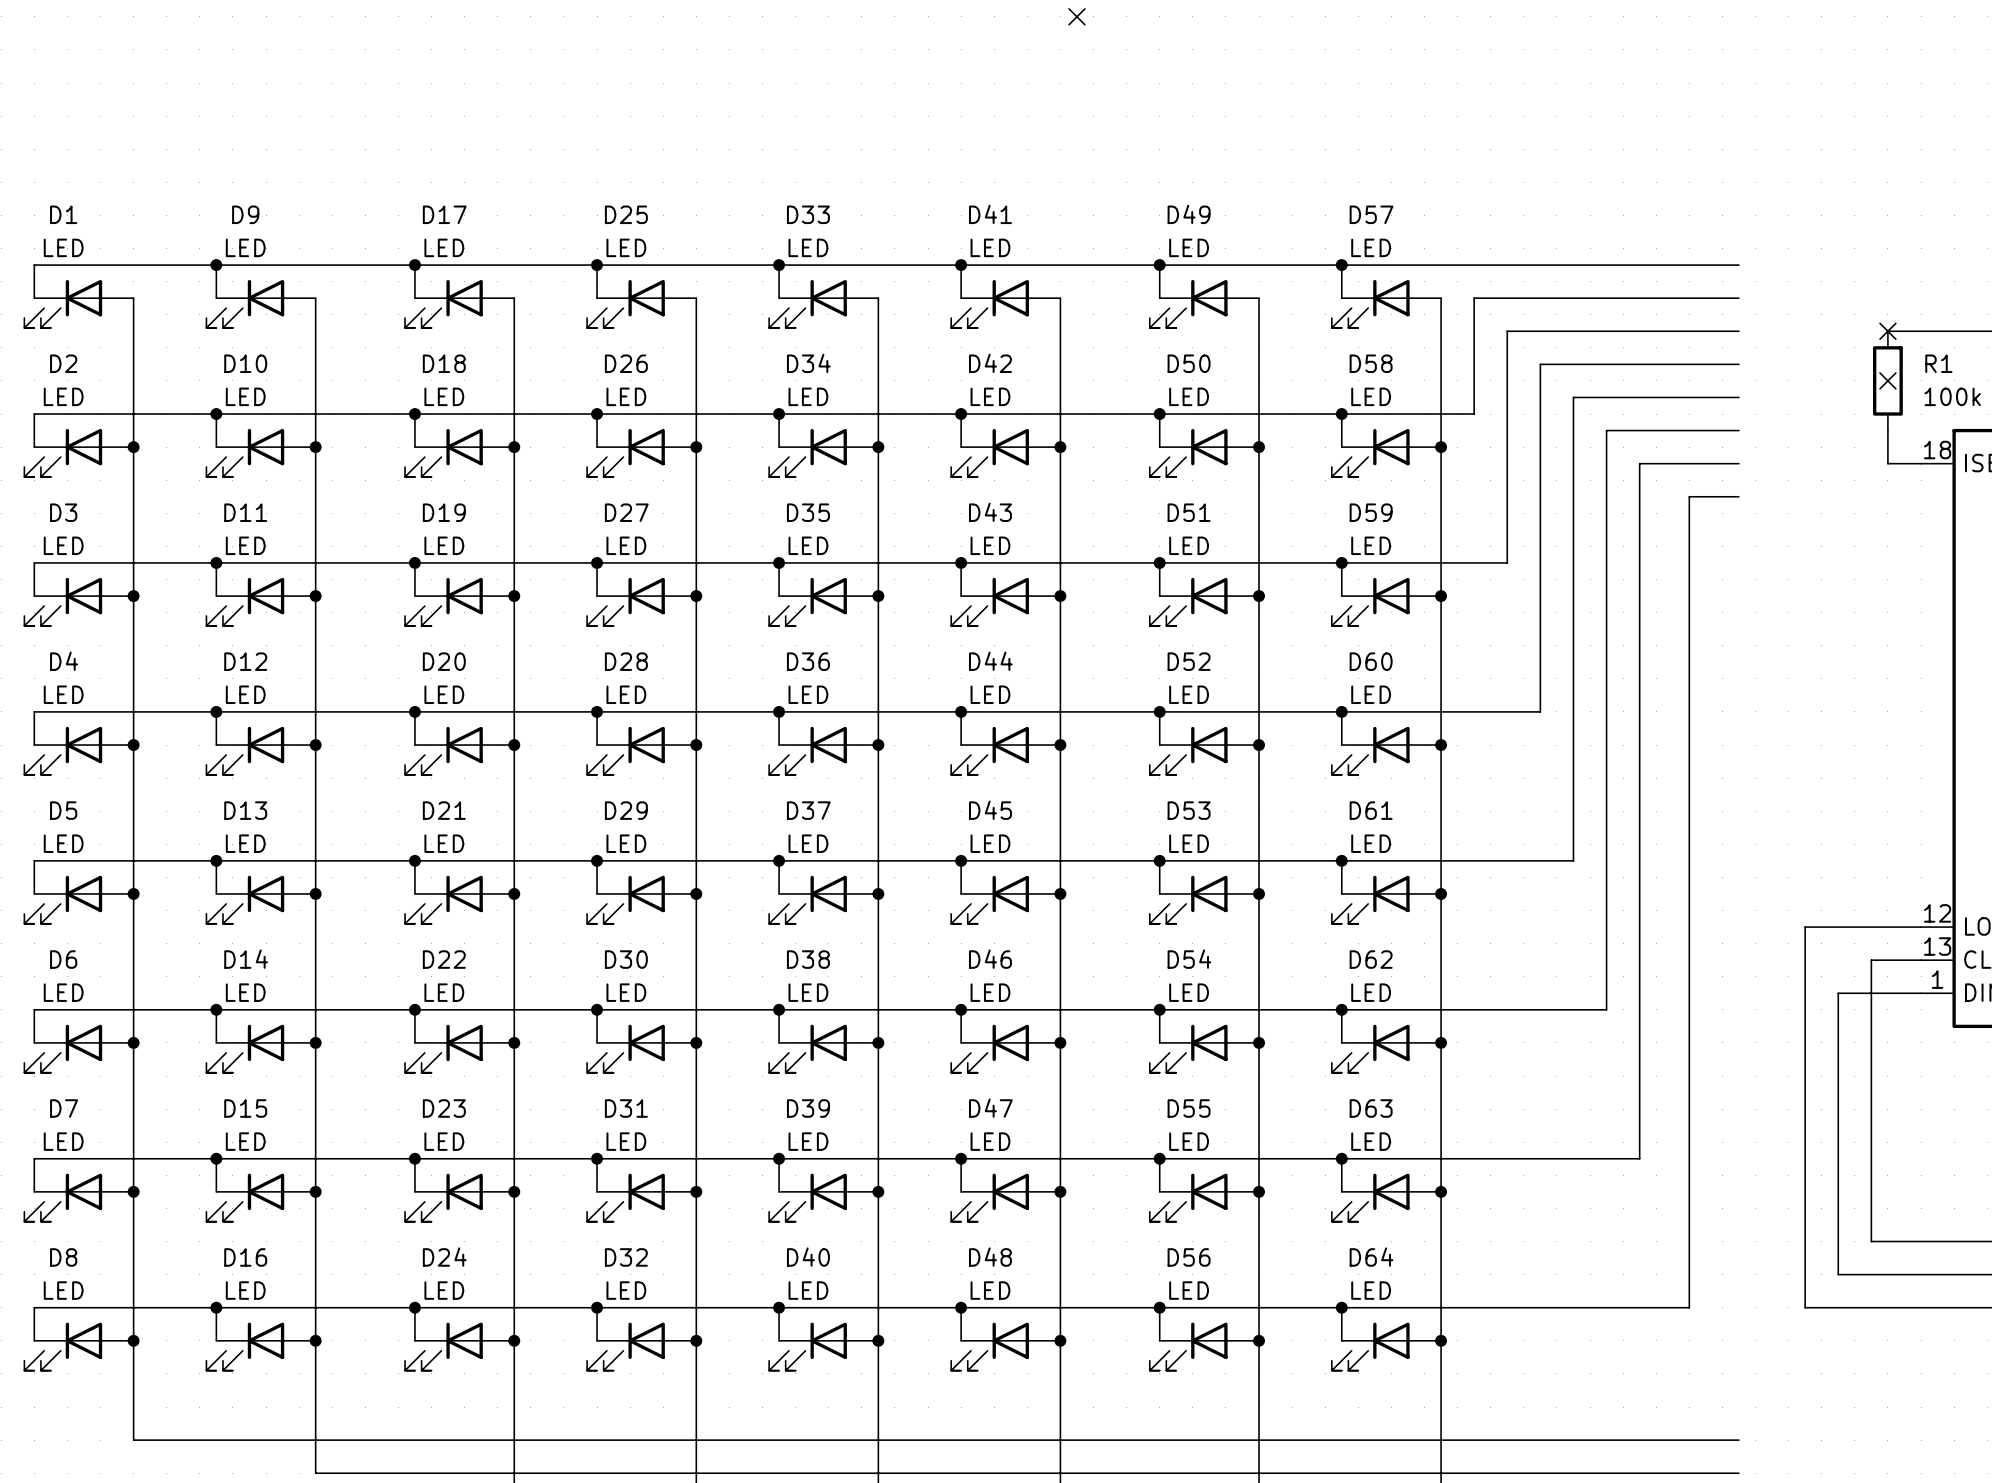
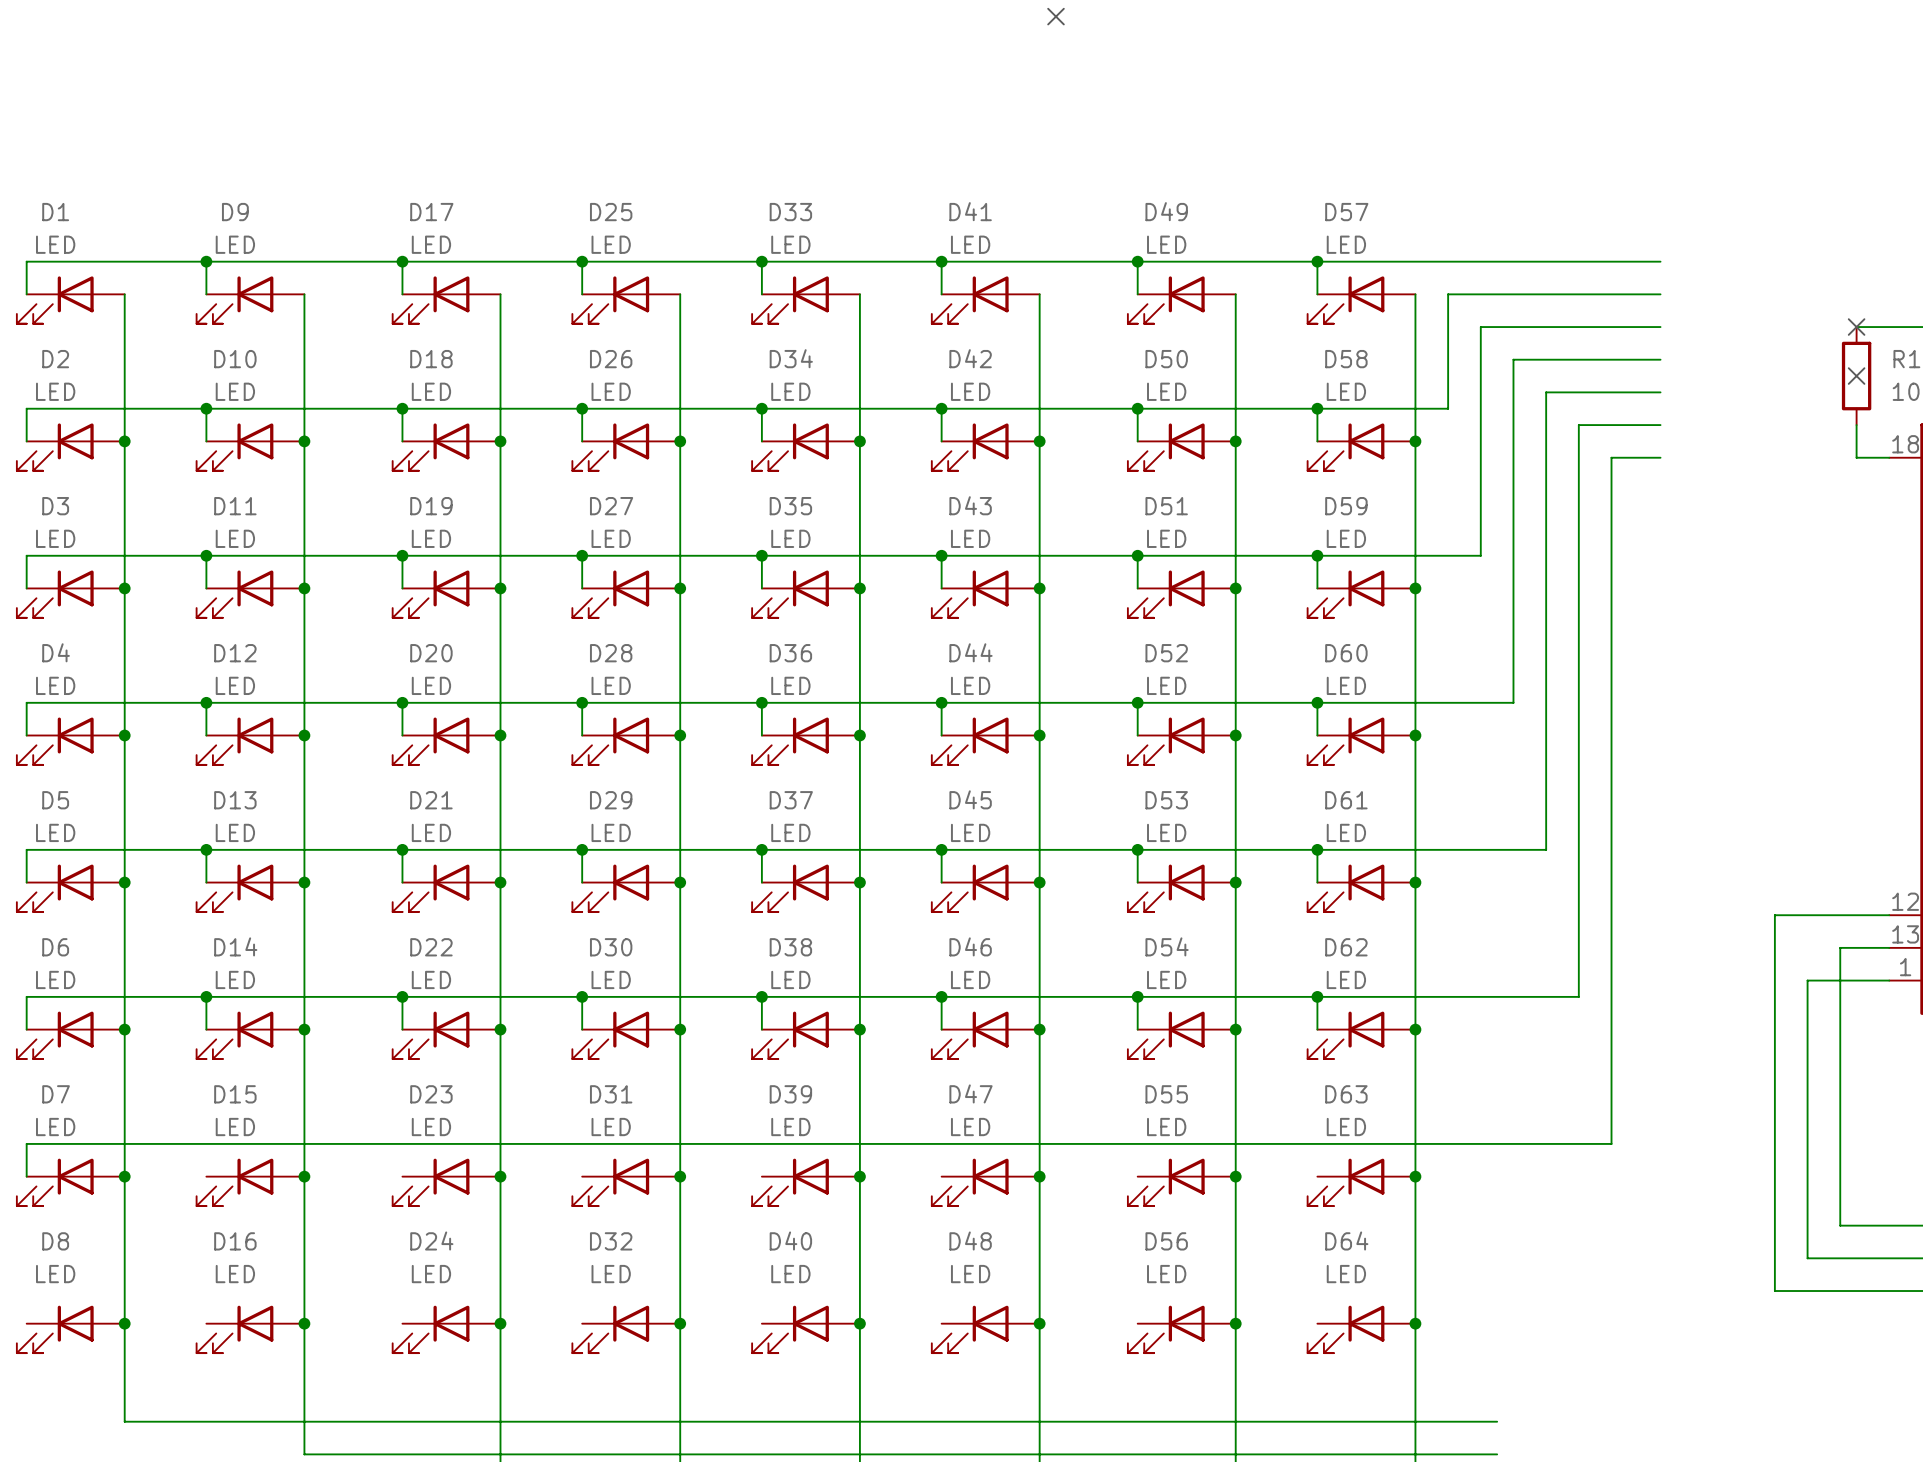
wire: (1689, 265) (1738, 265) -> none
wire: (1689, 298) (1738, 298) -> none
wire: (1689, 331) (1738, 331) -> none
wire: (1689, 364) (1738, 364) -> none
wire: (1689, 397) (1738, 397) -> none
wire: (1689, 430) (1738, 430) -> none
wire: (1689, 463) (1738, 463) -> none
wire: (1738, 496) (1689, 496) (1689, 1307) (34, 1307) (34, 1340) -> none
wire: (216, 1158) (216, 1191) -> none
junction: (216, 1158) -> none
wire: (414, 1158) (414, 1191) -> none
junction: (414, 1158) -> none
wire: (597, 1158) (597, 1191) -> none
junction: (597, 1158) -> none
wire: (779, 1158) (779, 1191) -> none
junction: (779, 1158) -> none
wire: (961, 1158) (961, 1191) -> none
junction: (961, 1158) -> none
wire: (1159, 1158) (1159, 1191) -> none
junction: (1159, 1158) -> none
wire: (1341, 1158) (1341, 1191) -> none
junction: (1341, 1158) -> none
wire: (216, 1307) (216, 1340) -> none
junction: (216, 1307) -> none
wire: (414, 1307) (414, 1340) -> none
junction: (414, 1307) -> none
wire: (597, 1307) (597, 1340) -> none
junction: (597, 1307) -> none
wire: (779, 1307) (779, 1340) -> none
junction: (779, 1307) -> none
wire: (961, 1307) (961, 1340) -> none
junction: (961, 1307) -> none
wire: (1159, 1307) (1159, 1340) -> none
junction: (1159, 1307) -> none
wire: (1341, 1307) (1341, 1340) -> none
junction: (1341, 1307) -> none
wire: (1523, 1440) (1738, 1440) -> none
wire: (1523, 1473) (1738, 1473) -> none

